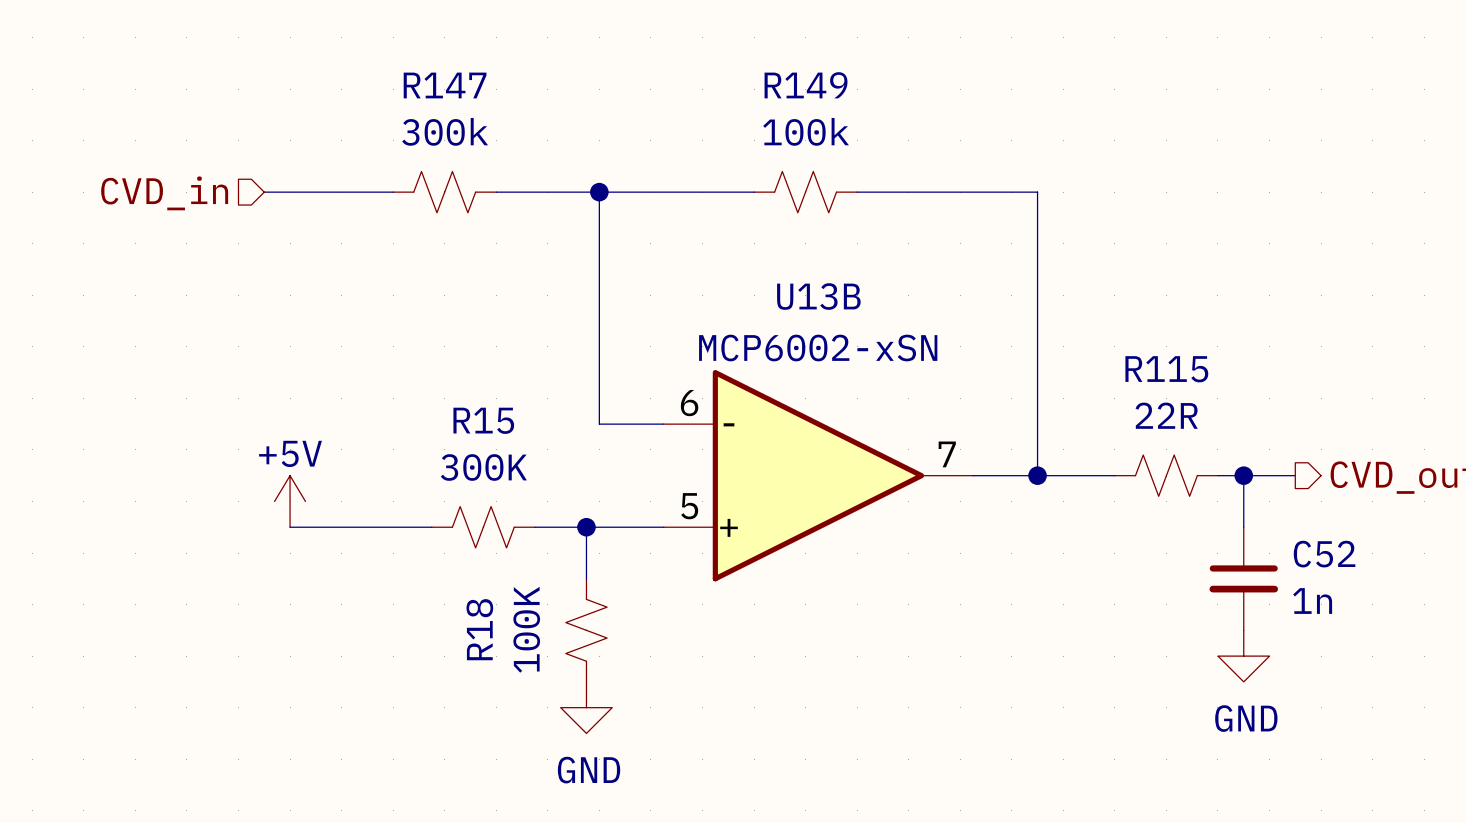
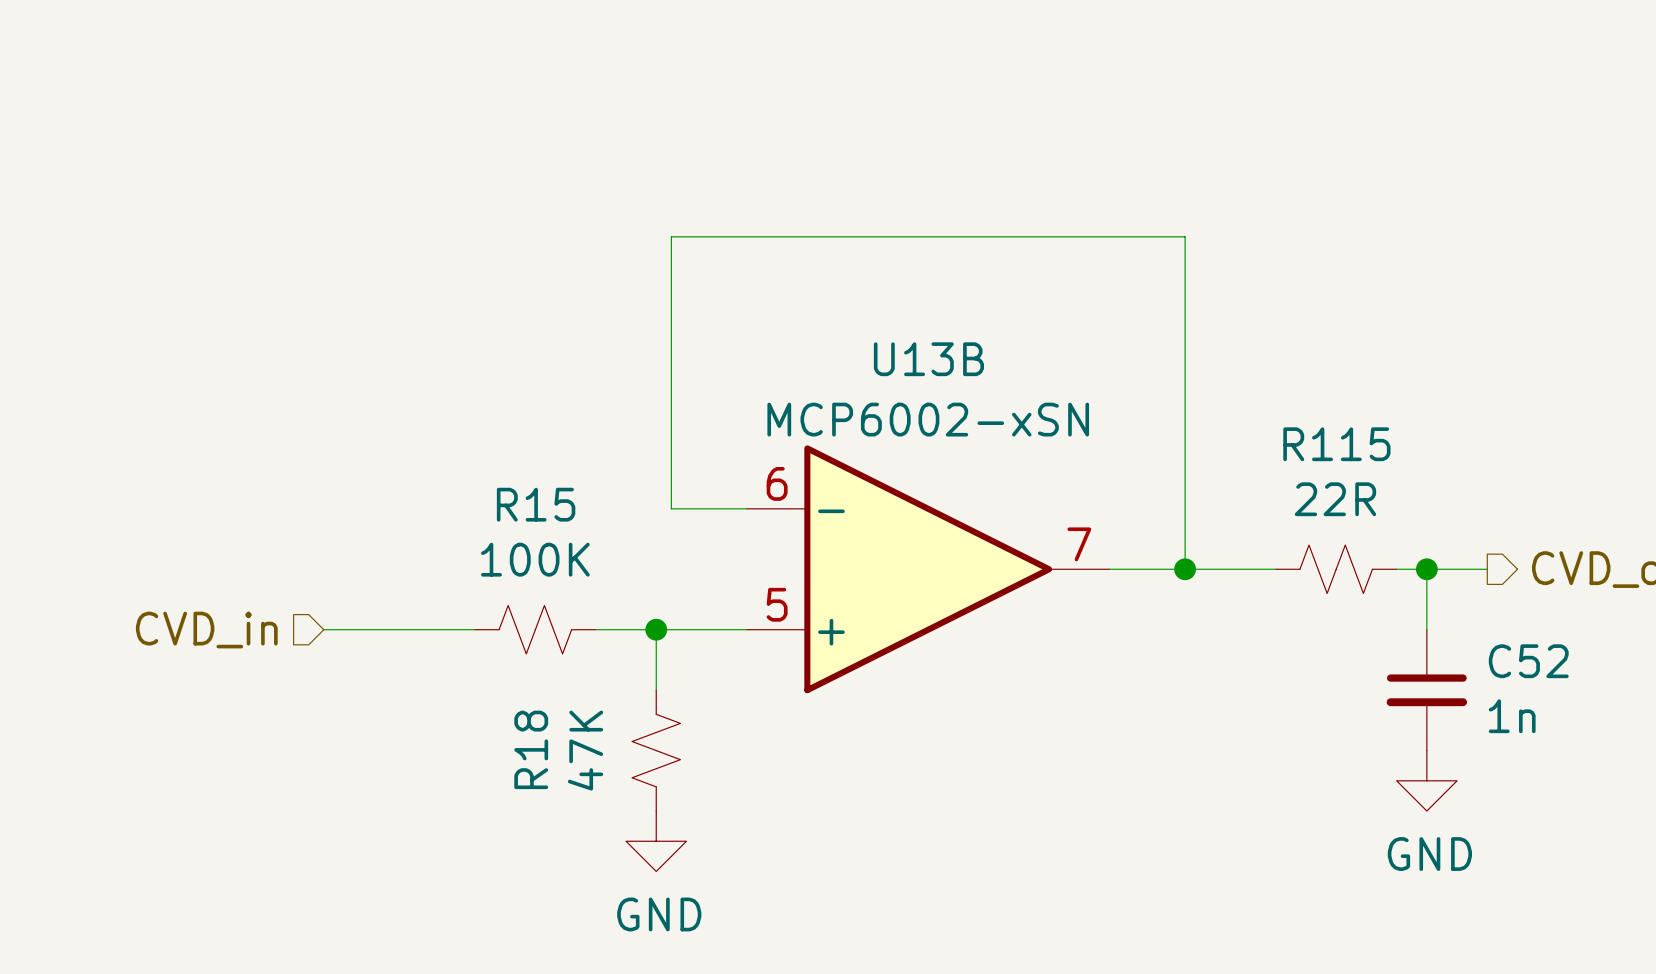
wire: (264, 192) (393, 192) -> none
R147: 300k (444, 192) -> none
wire: (496, 192) (599, 192) -> (852, 236) (973, 236)
junction: (599, 192) -> none
R149: 100k (805, 192) -> none
hierarchical label position: CVD_in (164, 193) -> CVD_in (206, 630)
R15 value: 300K (483, 467) -> 100K (535, 559)
power symbol: +5V (290, 501) -> none
wire: (290, 527) (302, 527) -> none
R18 value: 100K (526, 629) -> 47K (585, 750)

